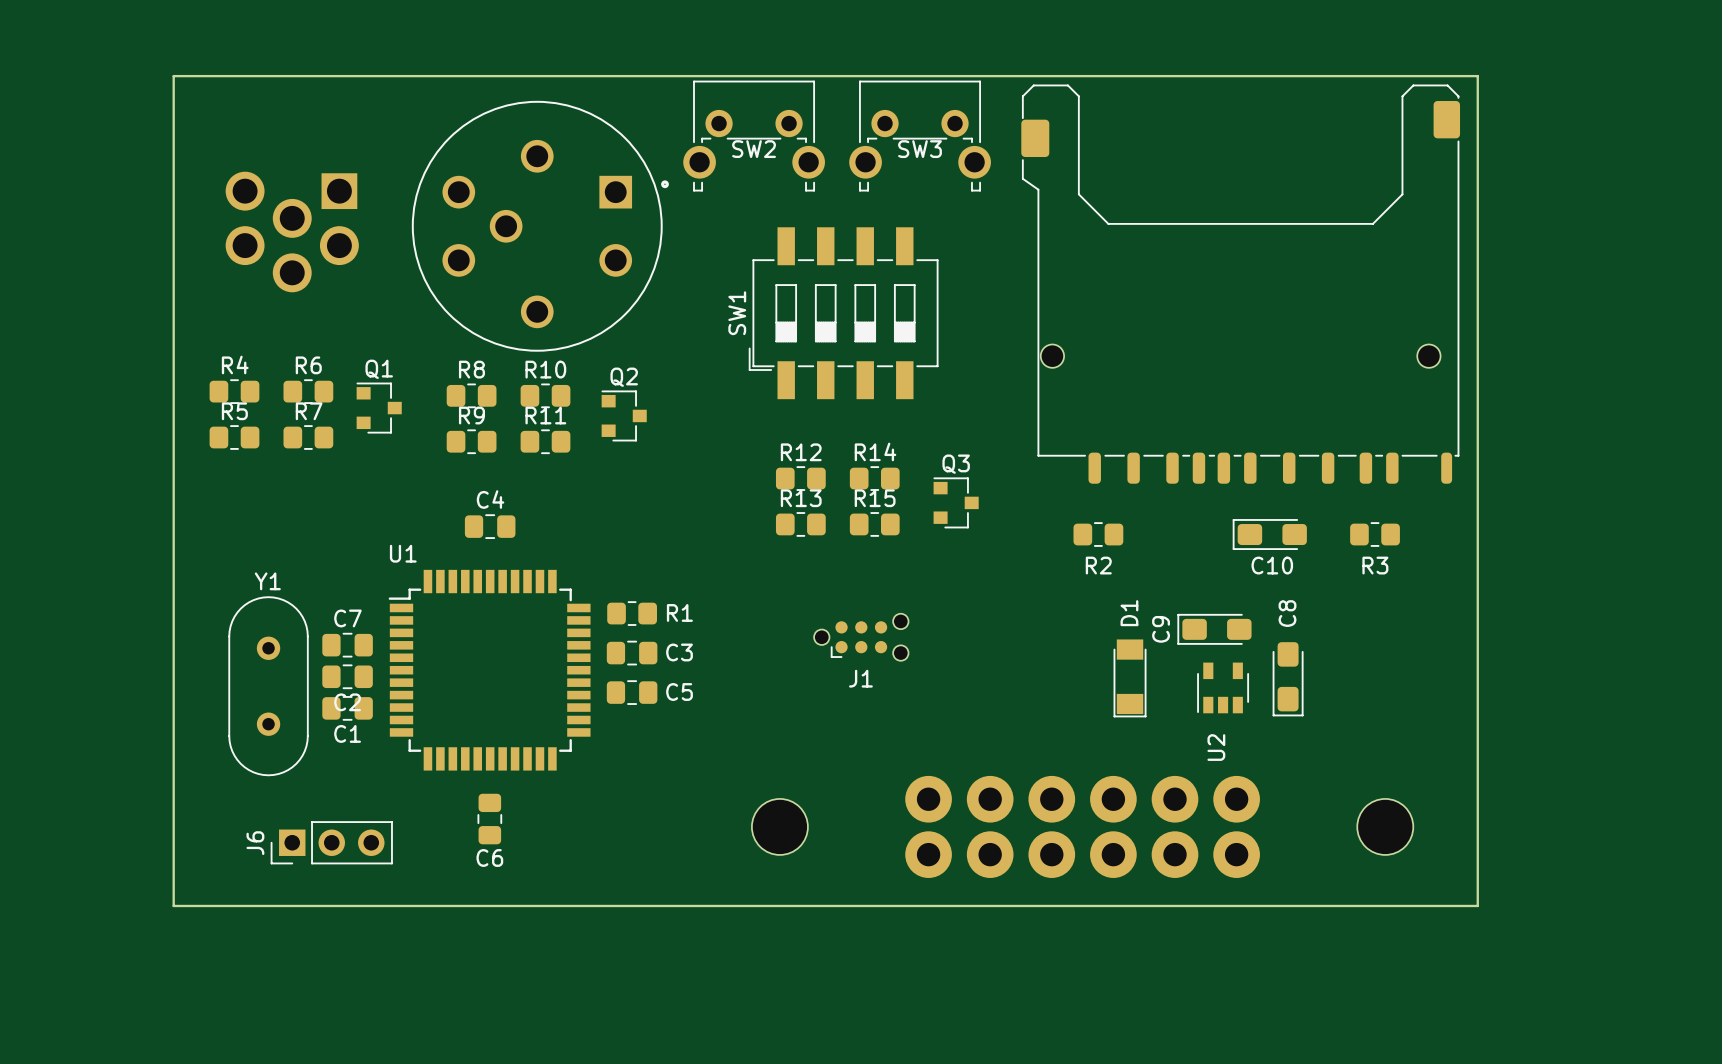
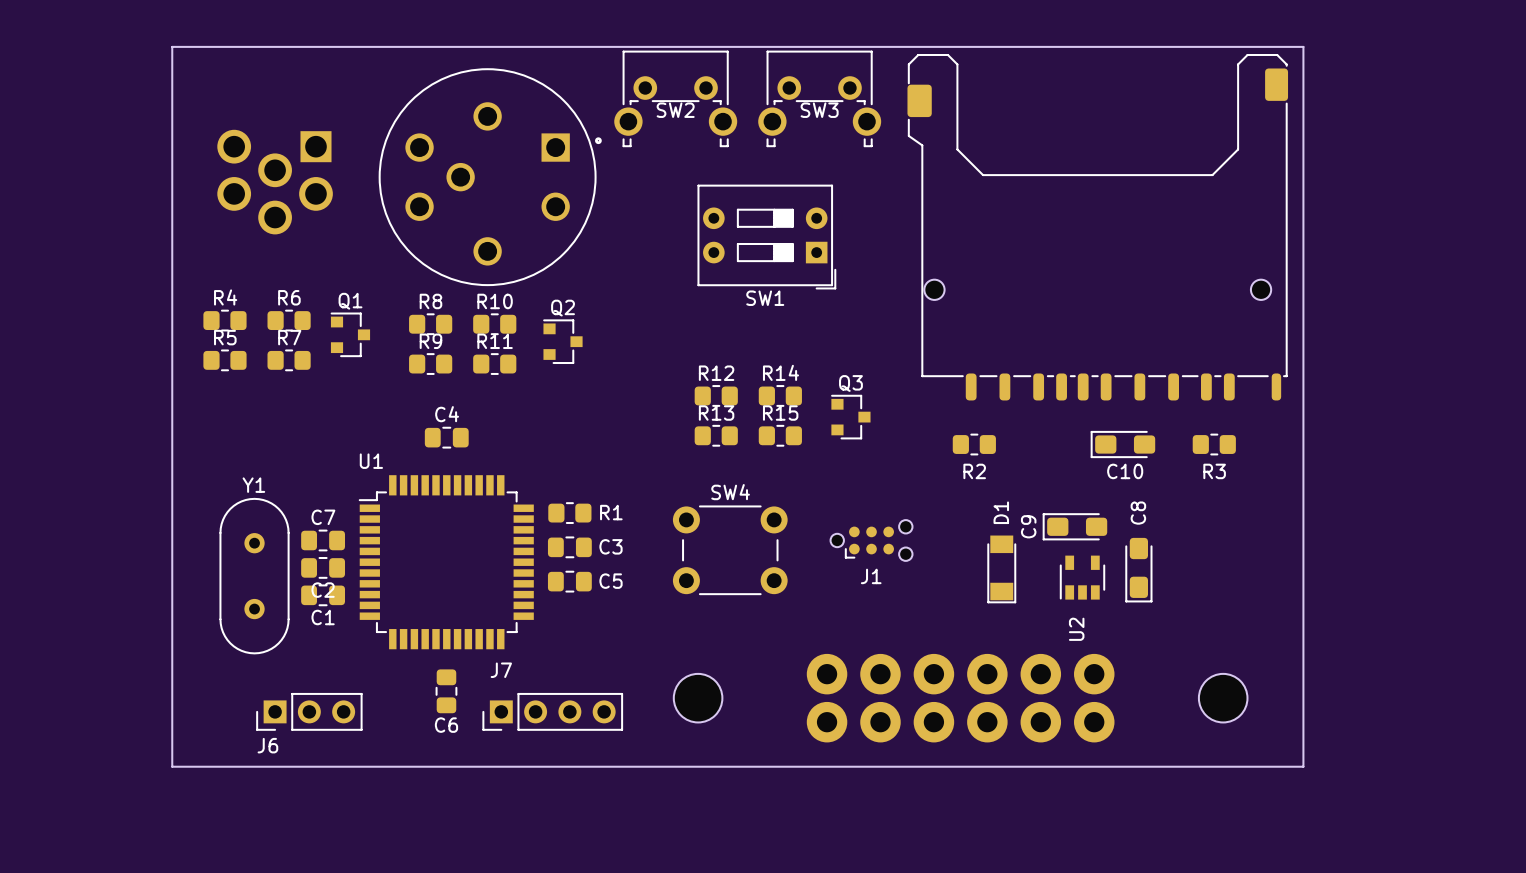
SW1 footprint: [748, 227, 939, 400] -> [697, 184, 837, 290]
SW1 name position: SW1 (737, 313) -> SW1 (765, 298)
J1 position: (861, 637) -> (871, 540)
SW4: none -> (730, 550)
J7: none -> (552, 711)
J6 name rotation: 0° (255, 843) -> 90° clockwise (267, 745)
J6 name position: J6 (255, 843) -> J6 (267, 745)

